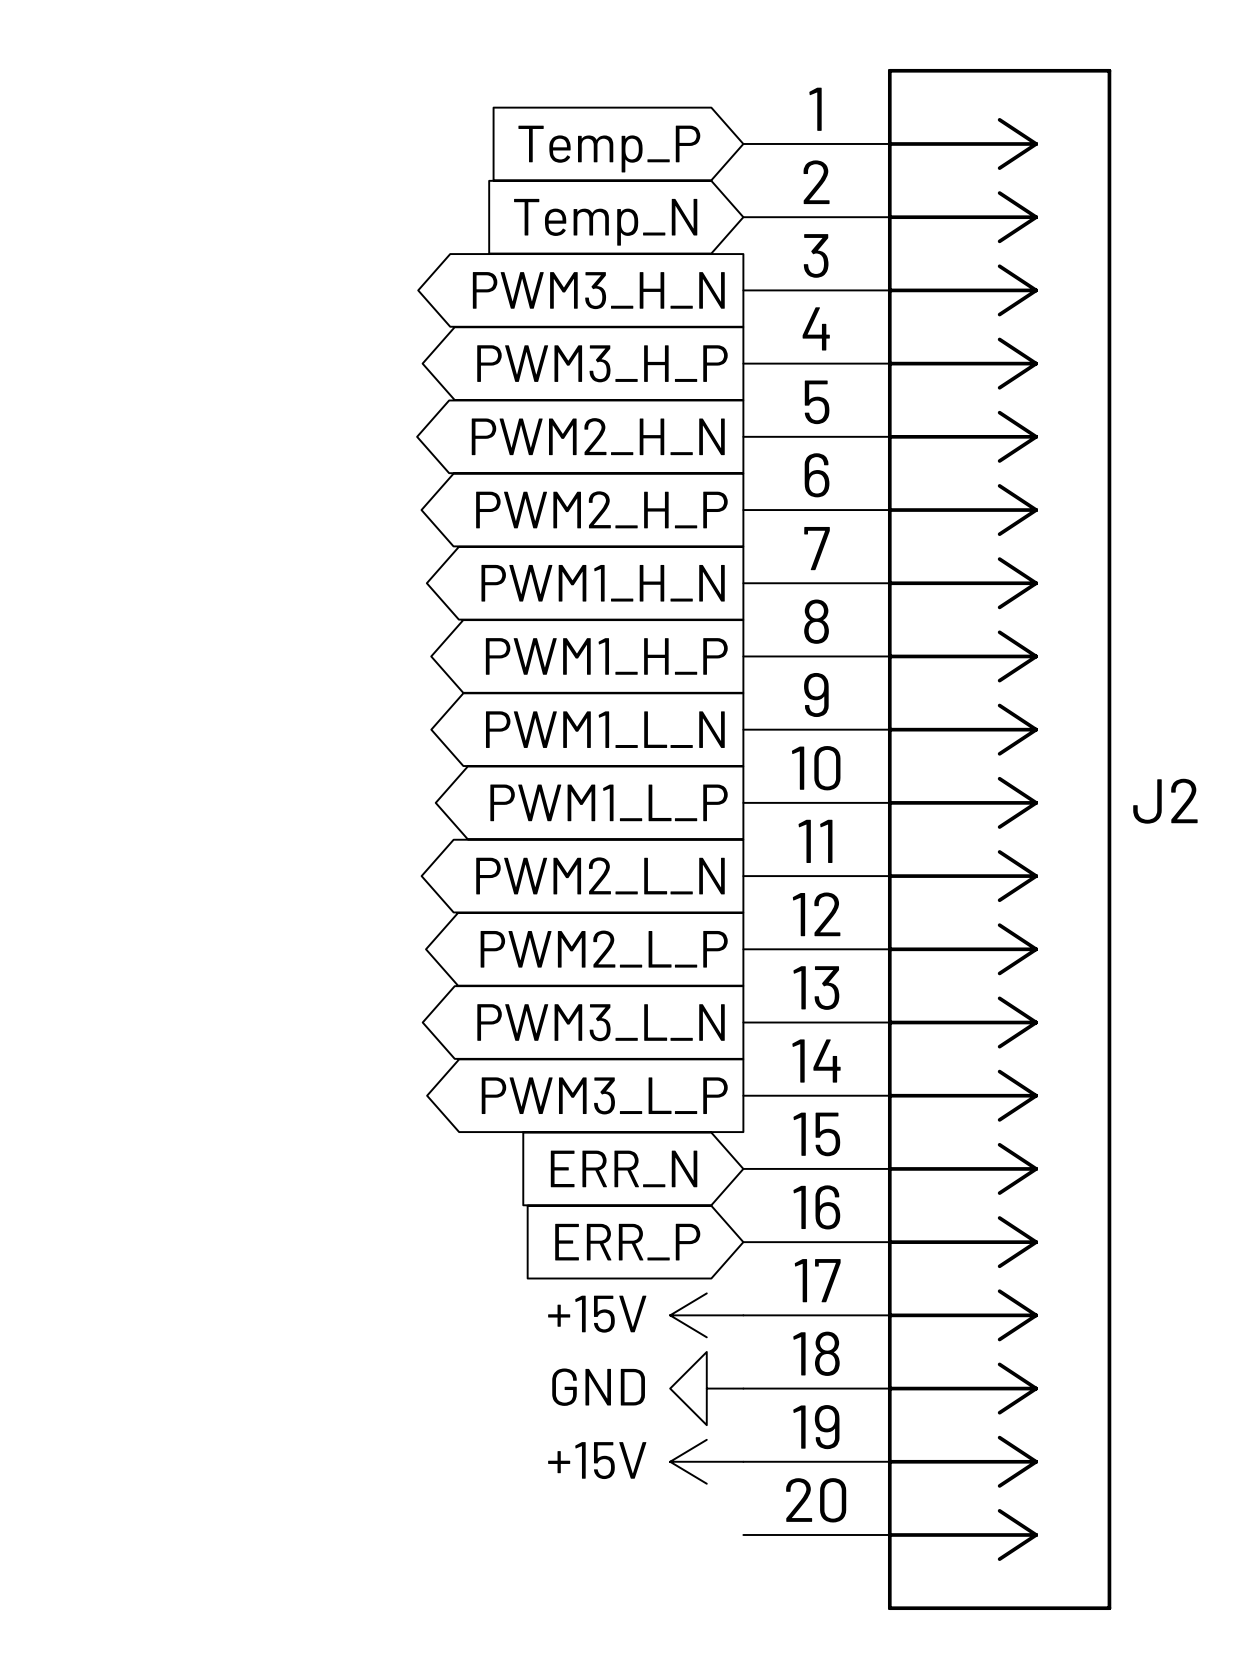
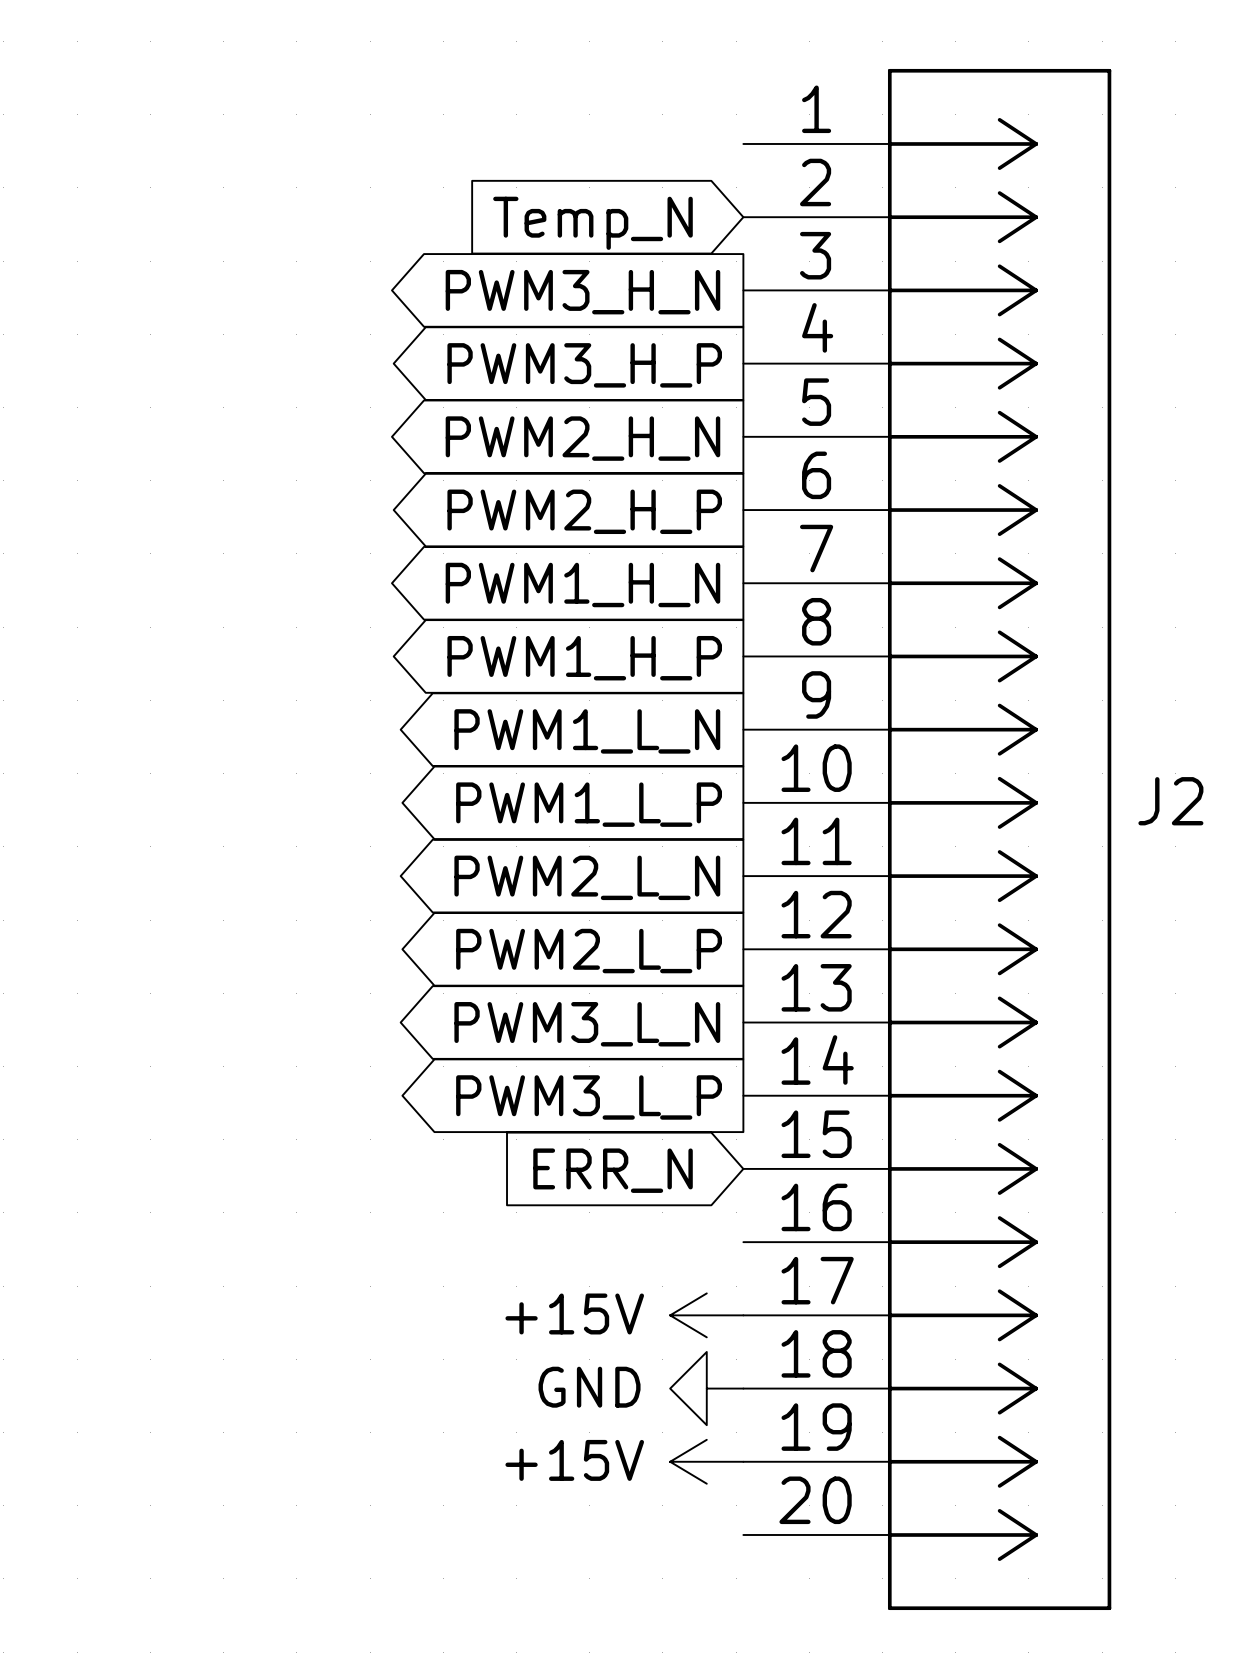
global label: Temp_P (609, 149) -> none
global label: ERR_P (627, 1242) -> none

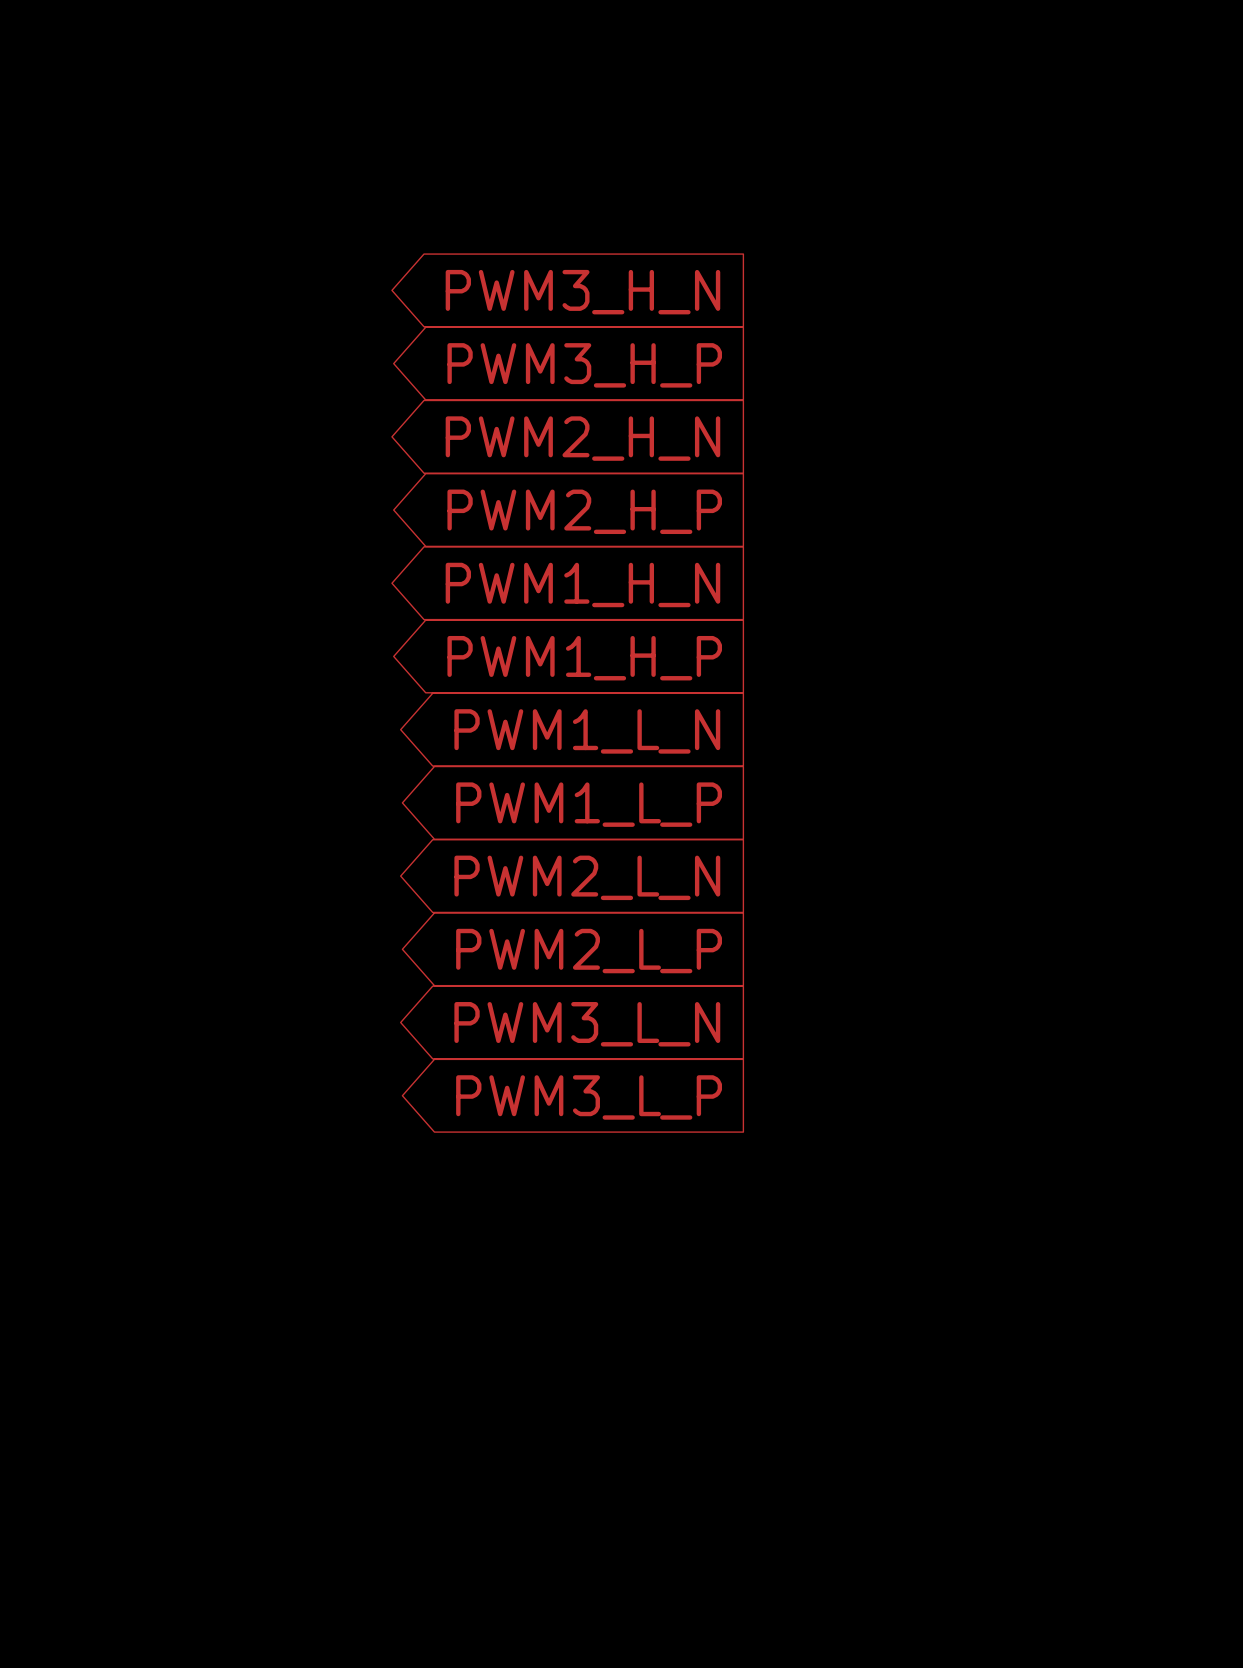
global label: Temp_N (592, 223) -> none
J2: (927, 839) -> none
global label: ERR_N (613, 1170) -> none
power symbol: +15V (706, 1315) -> none
power symbol: GND (706, 1388) -> none
power symbol: +15V (706, 1461) -> none

